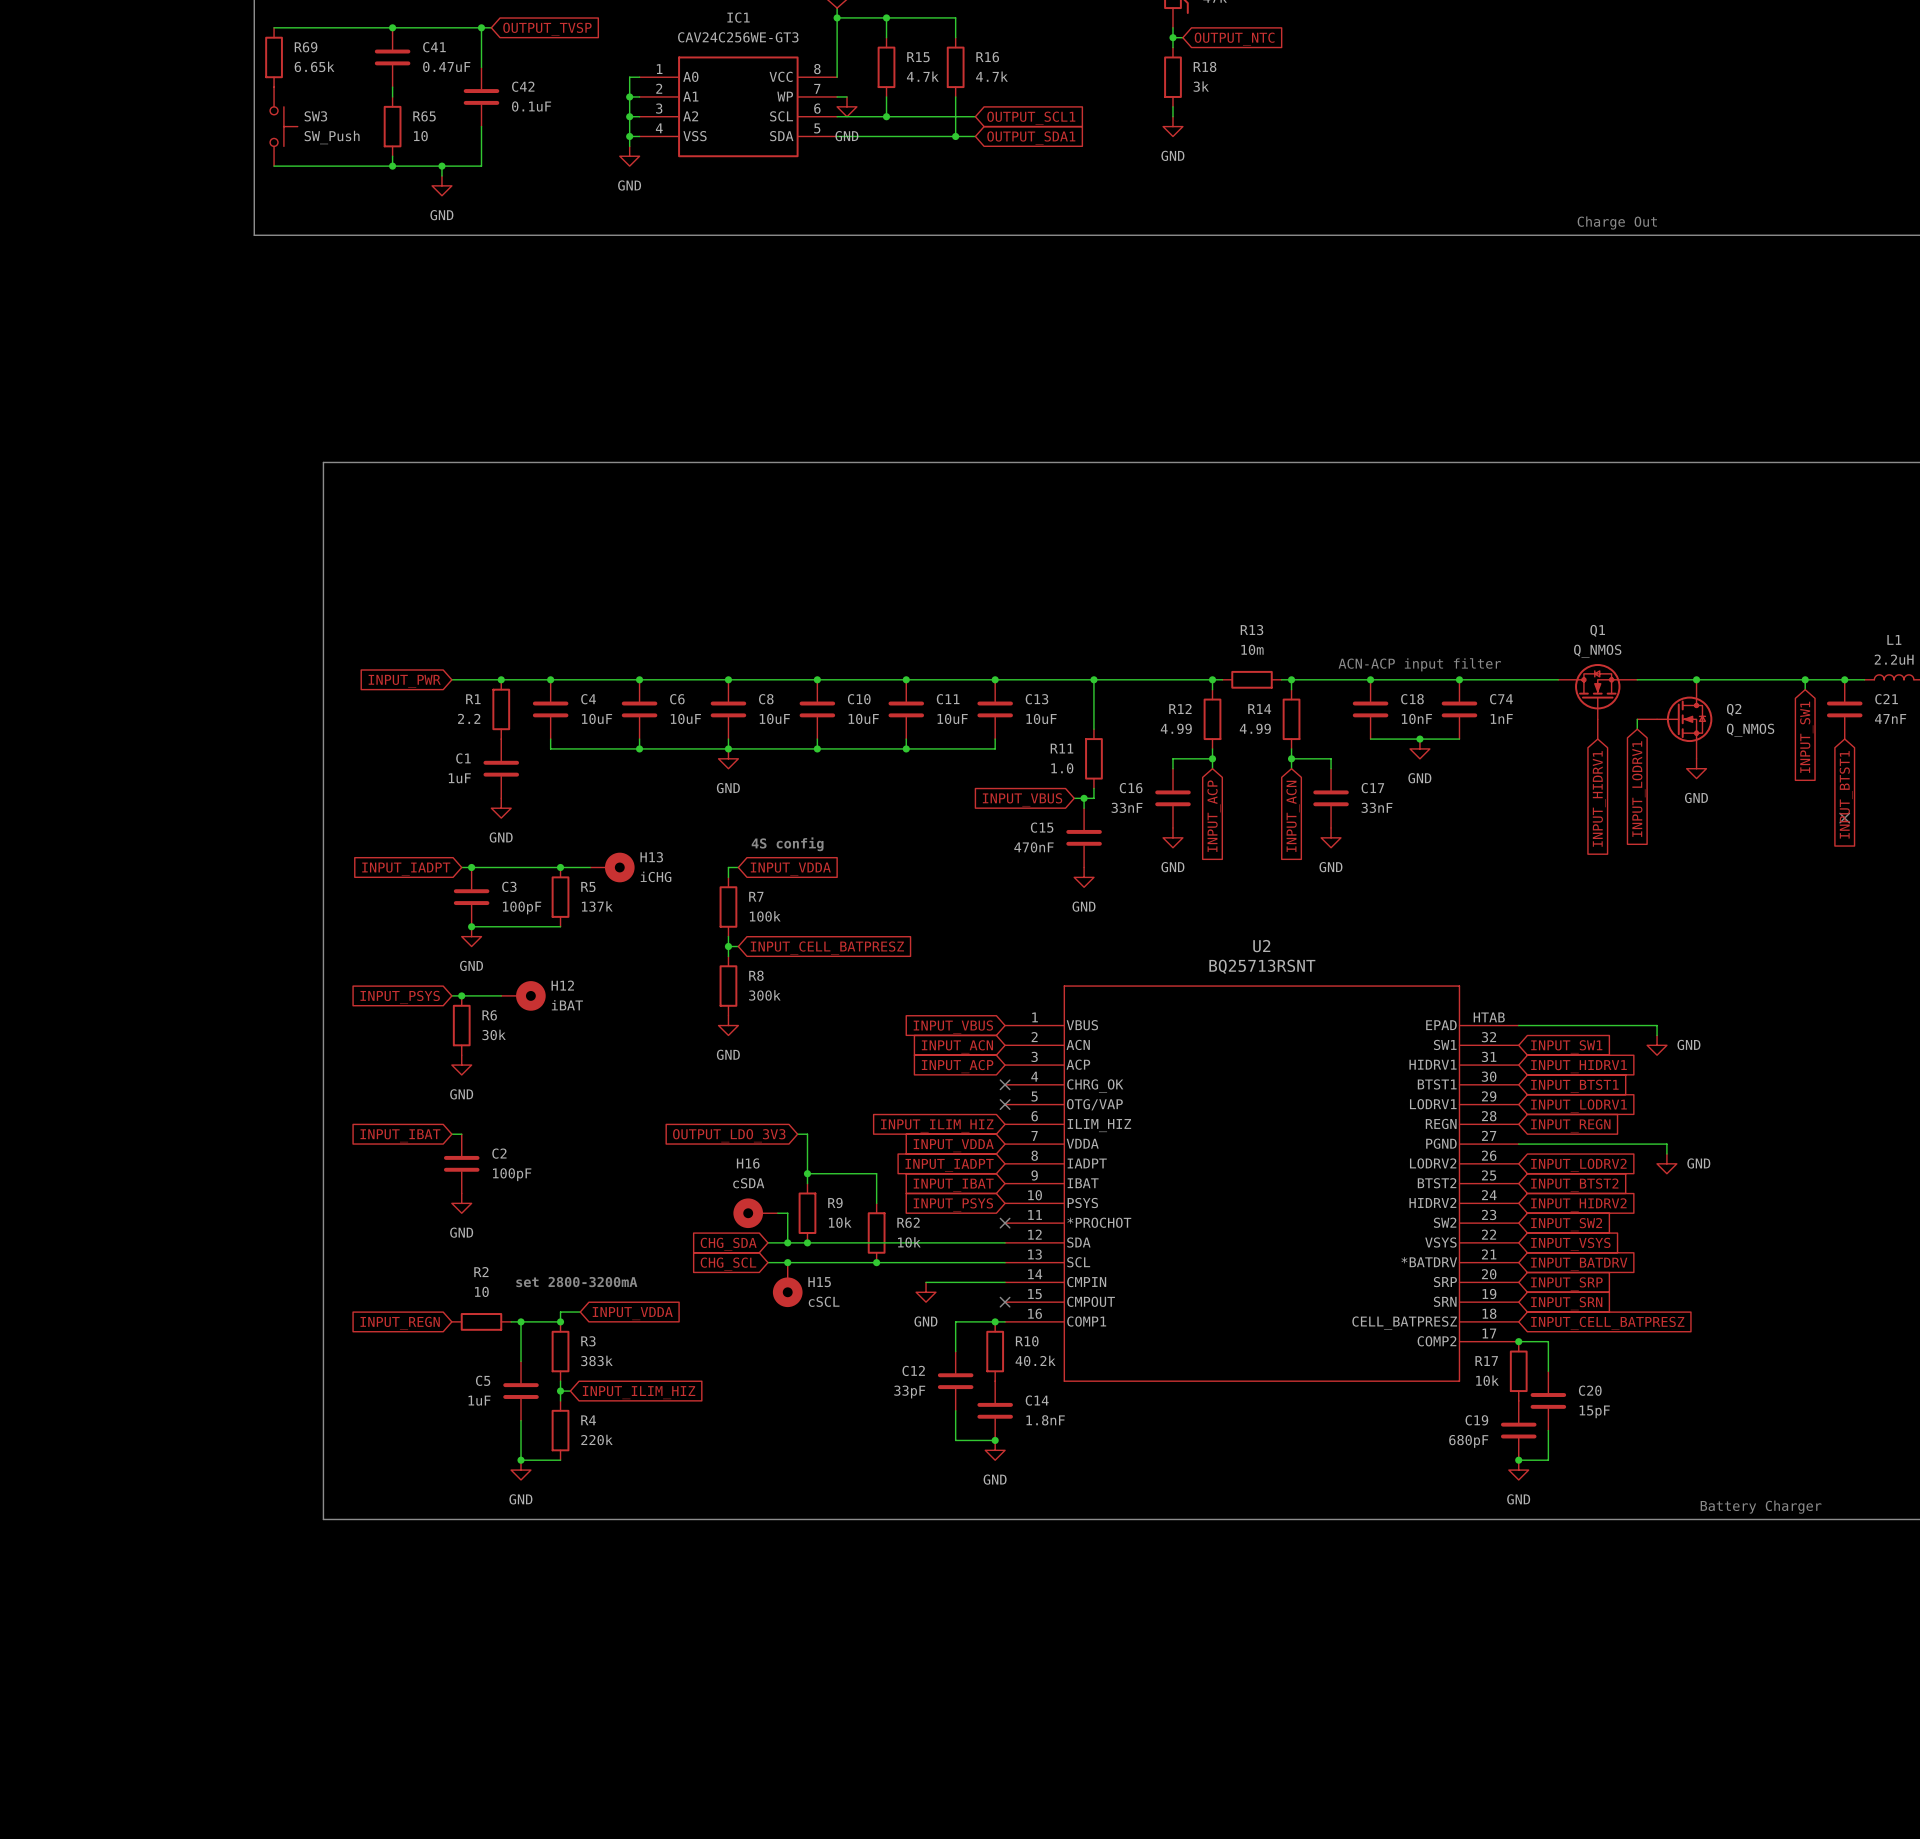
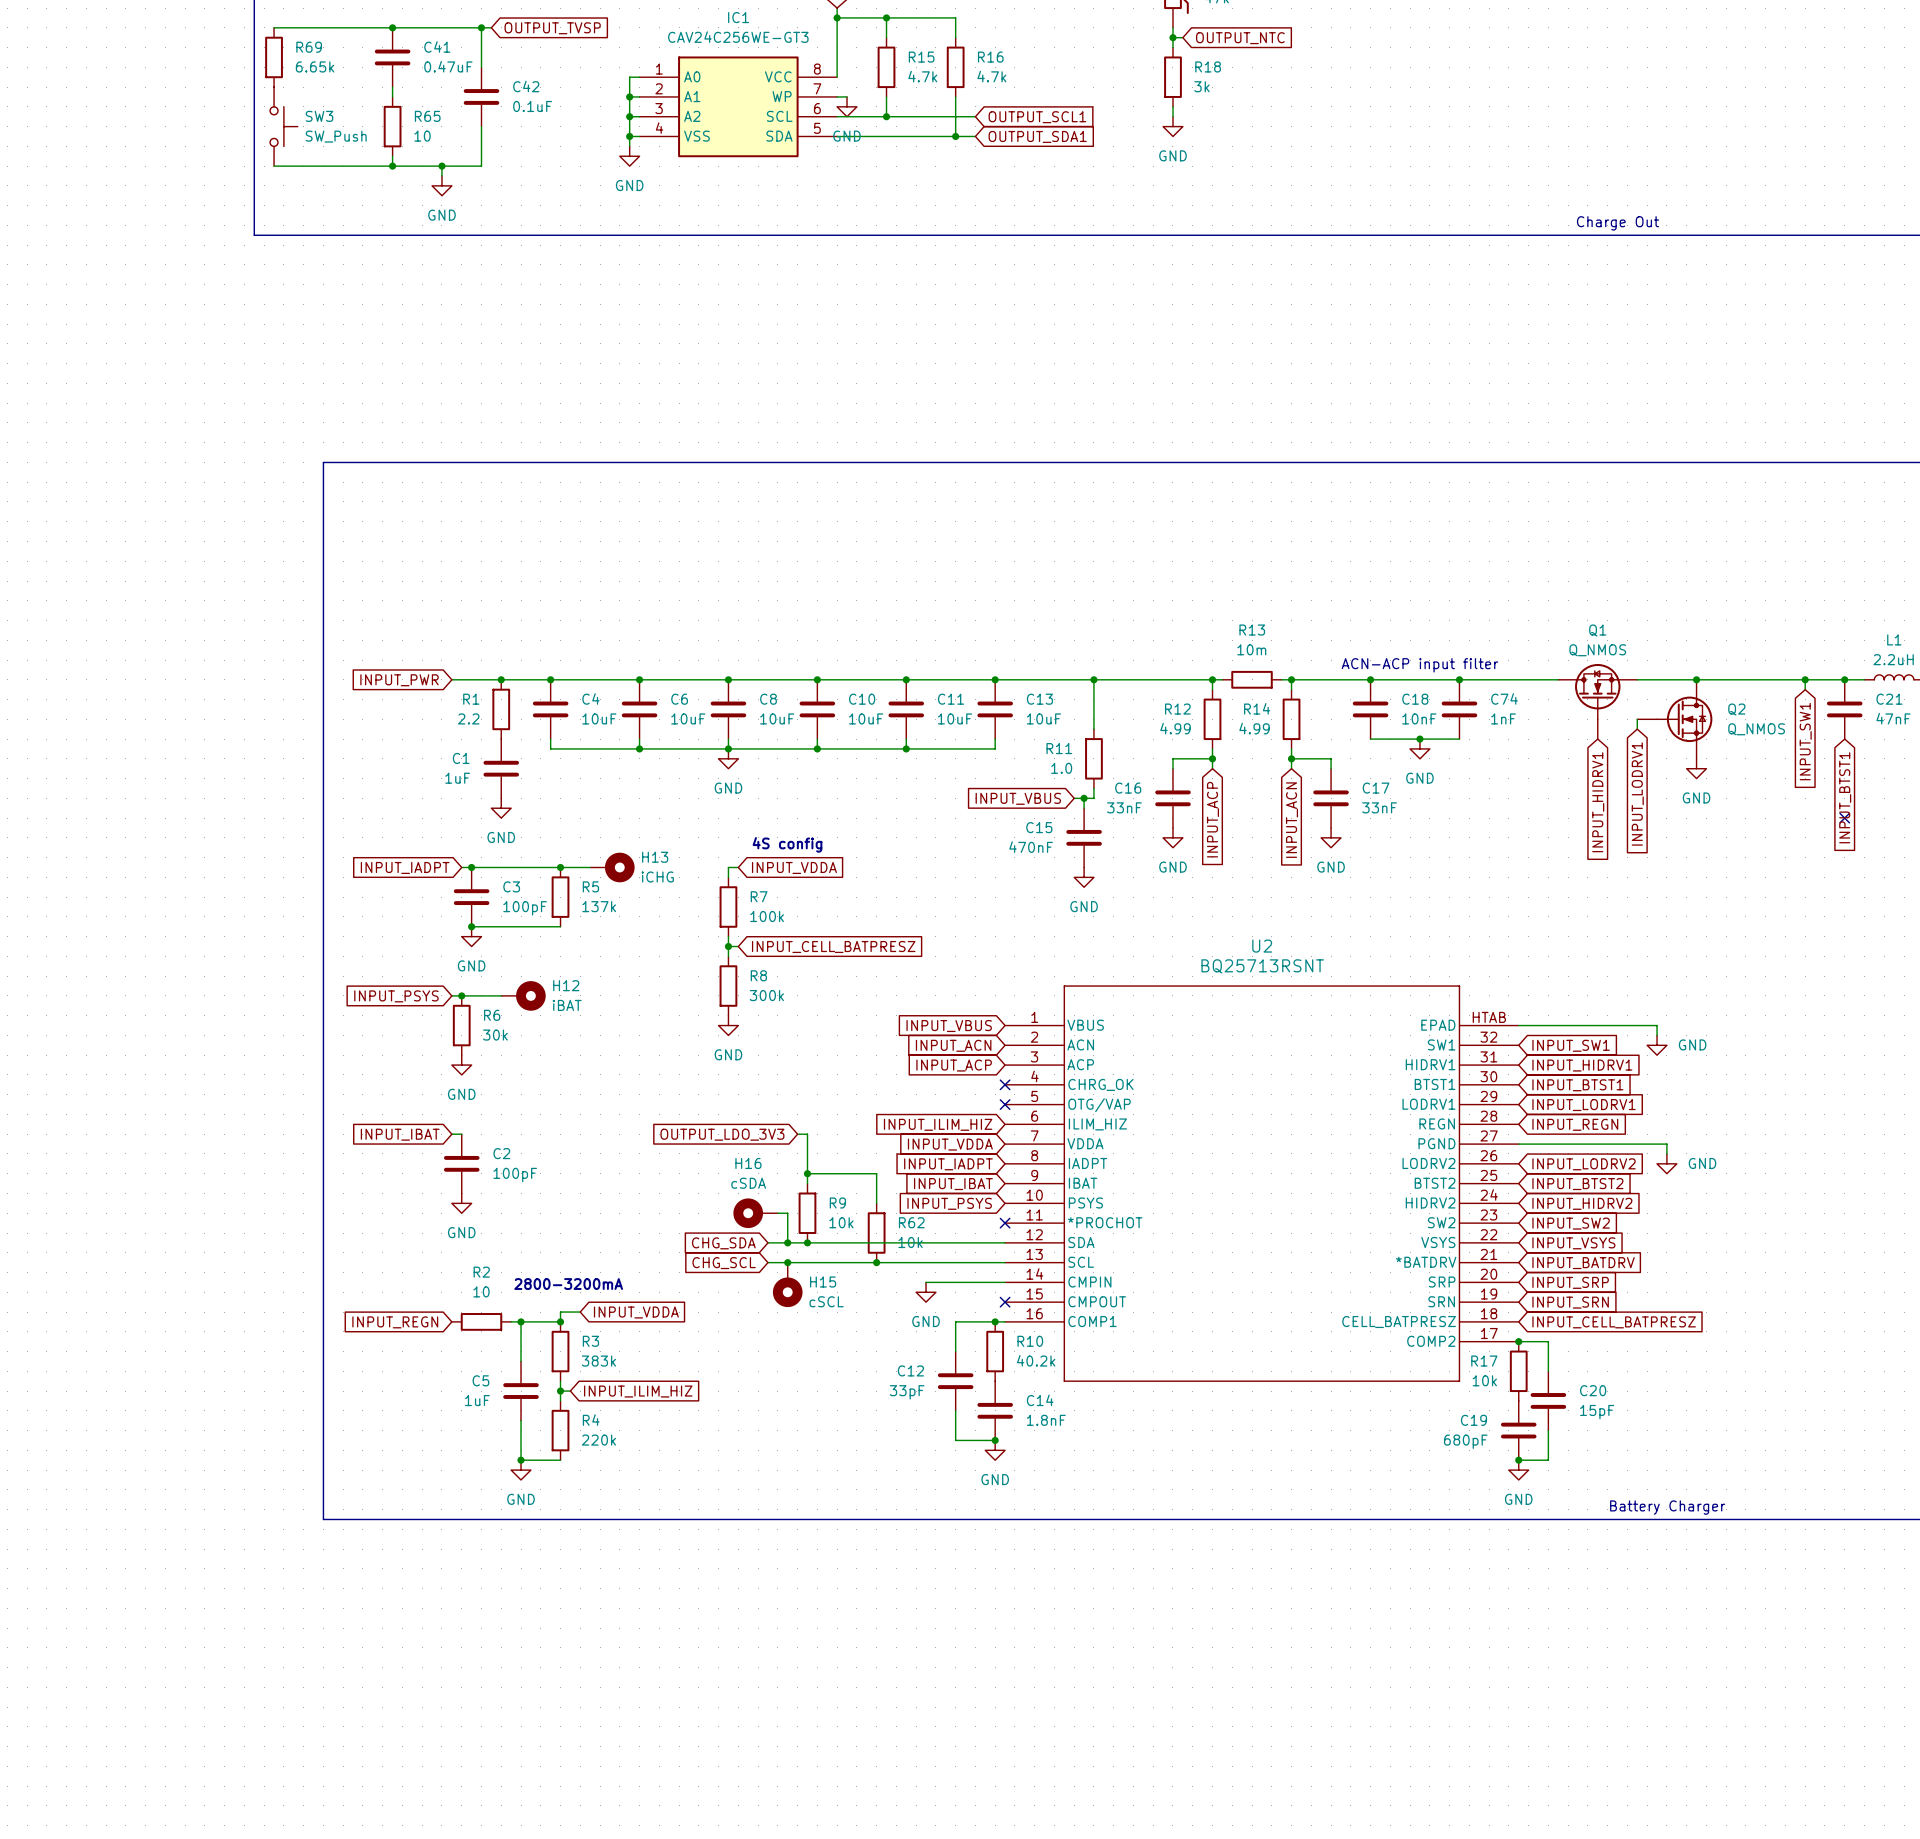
text: set 2800-3200mA (576, 1282) -> 2800-3200mA (568, 1284)
text position: Battery Charger (1761, 1507) -> Battery Charger (1667, 1507)

